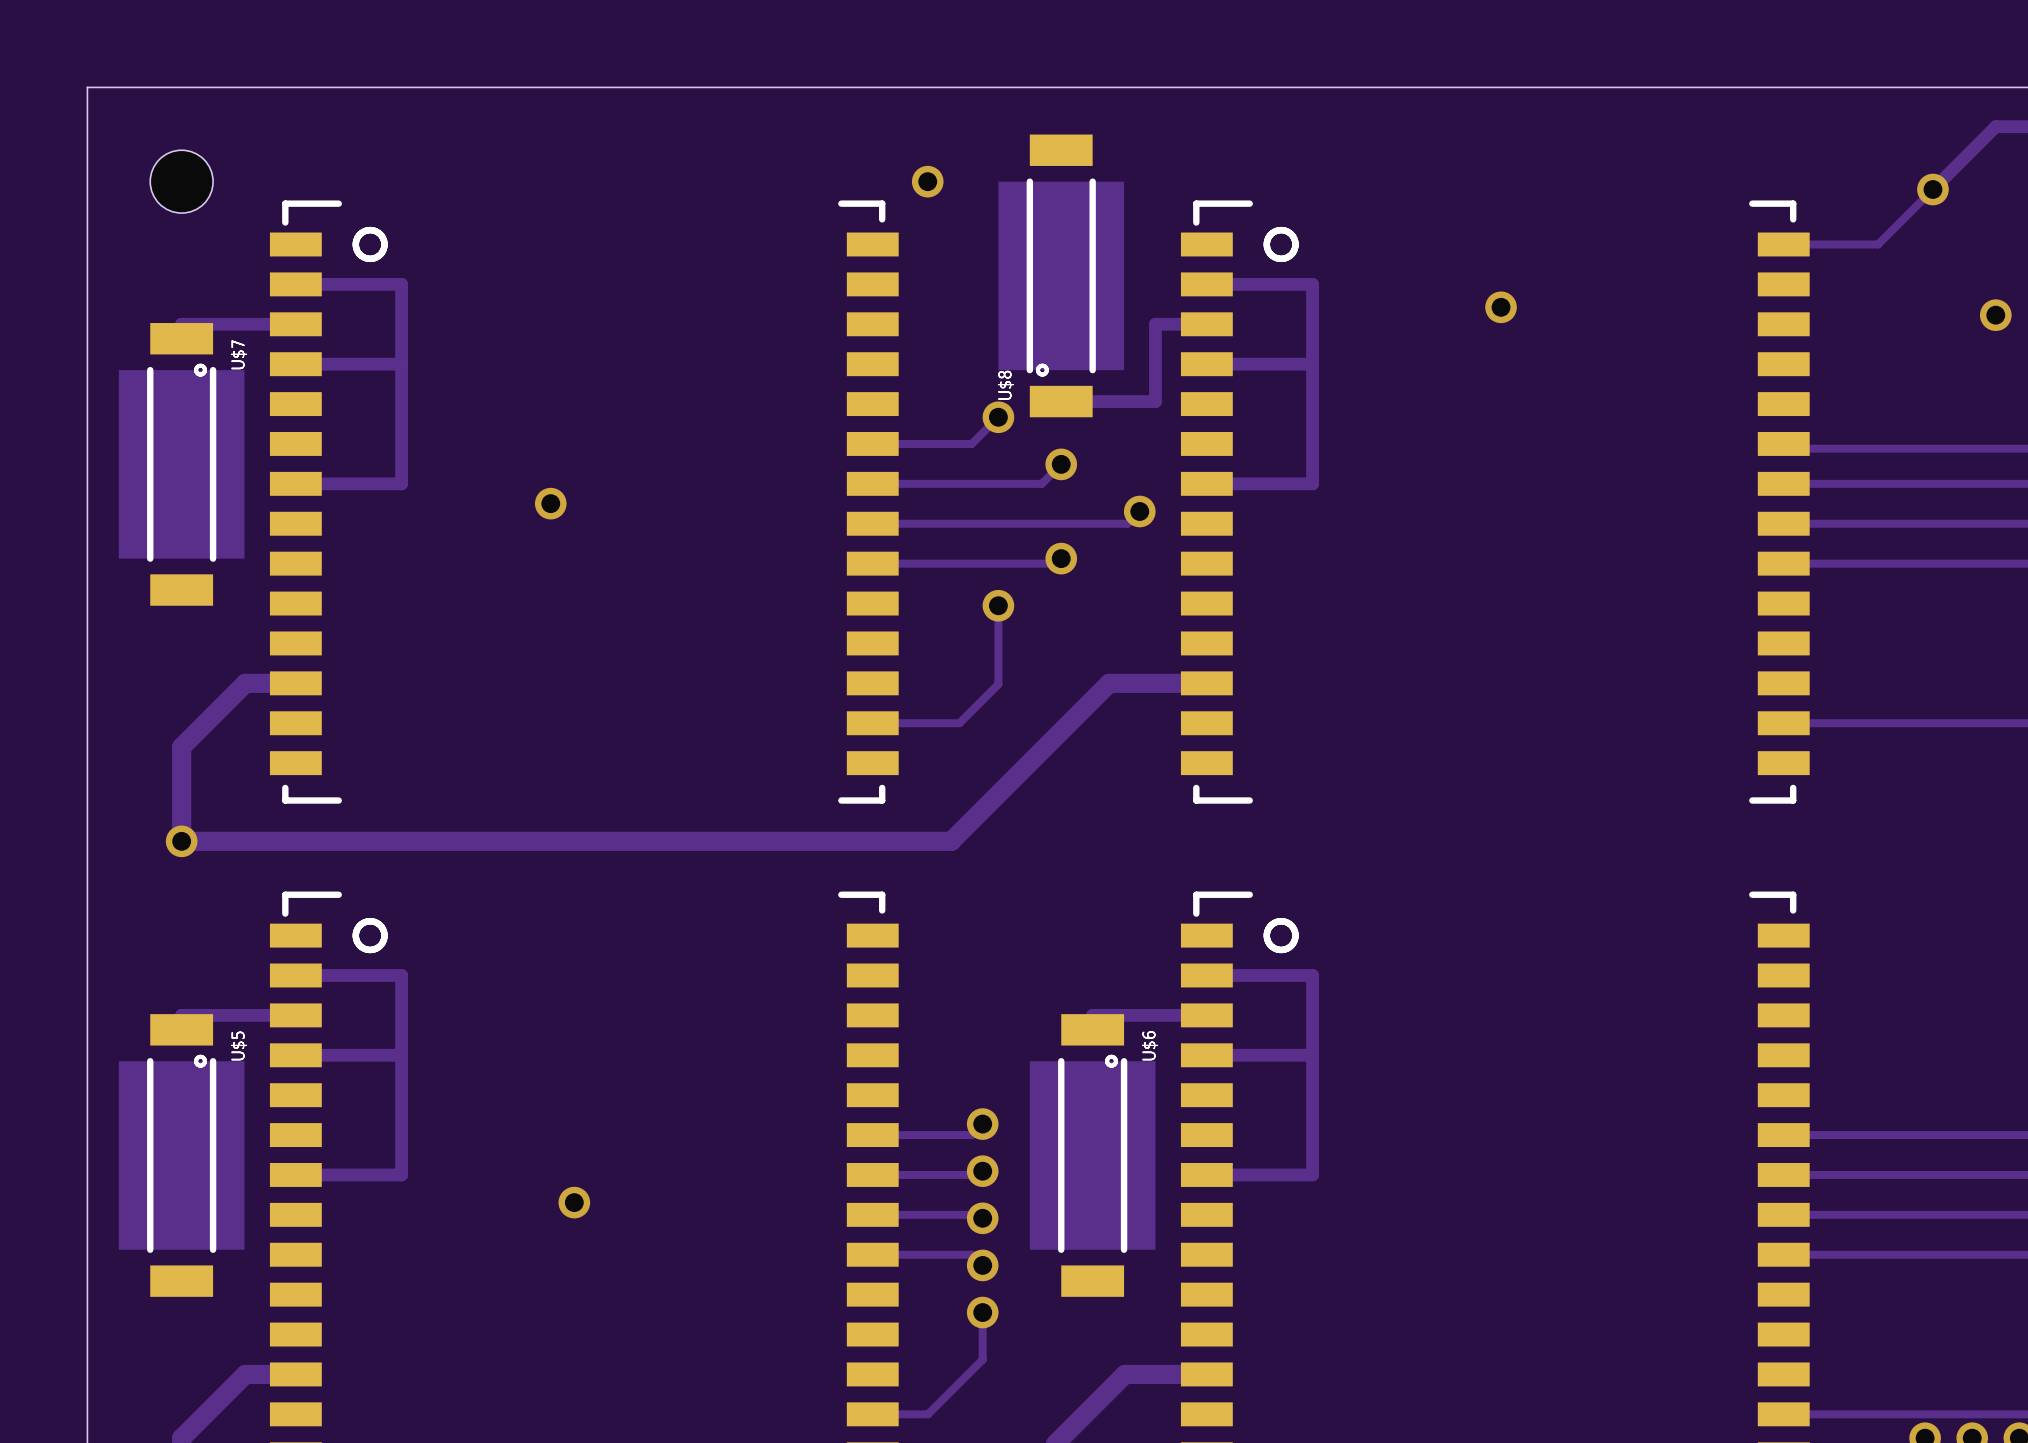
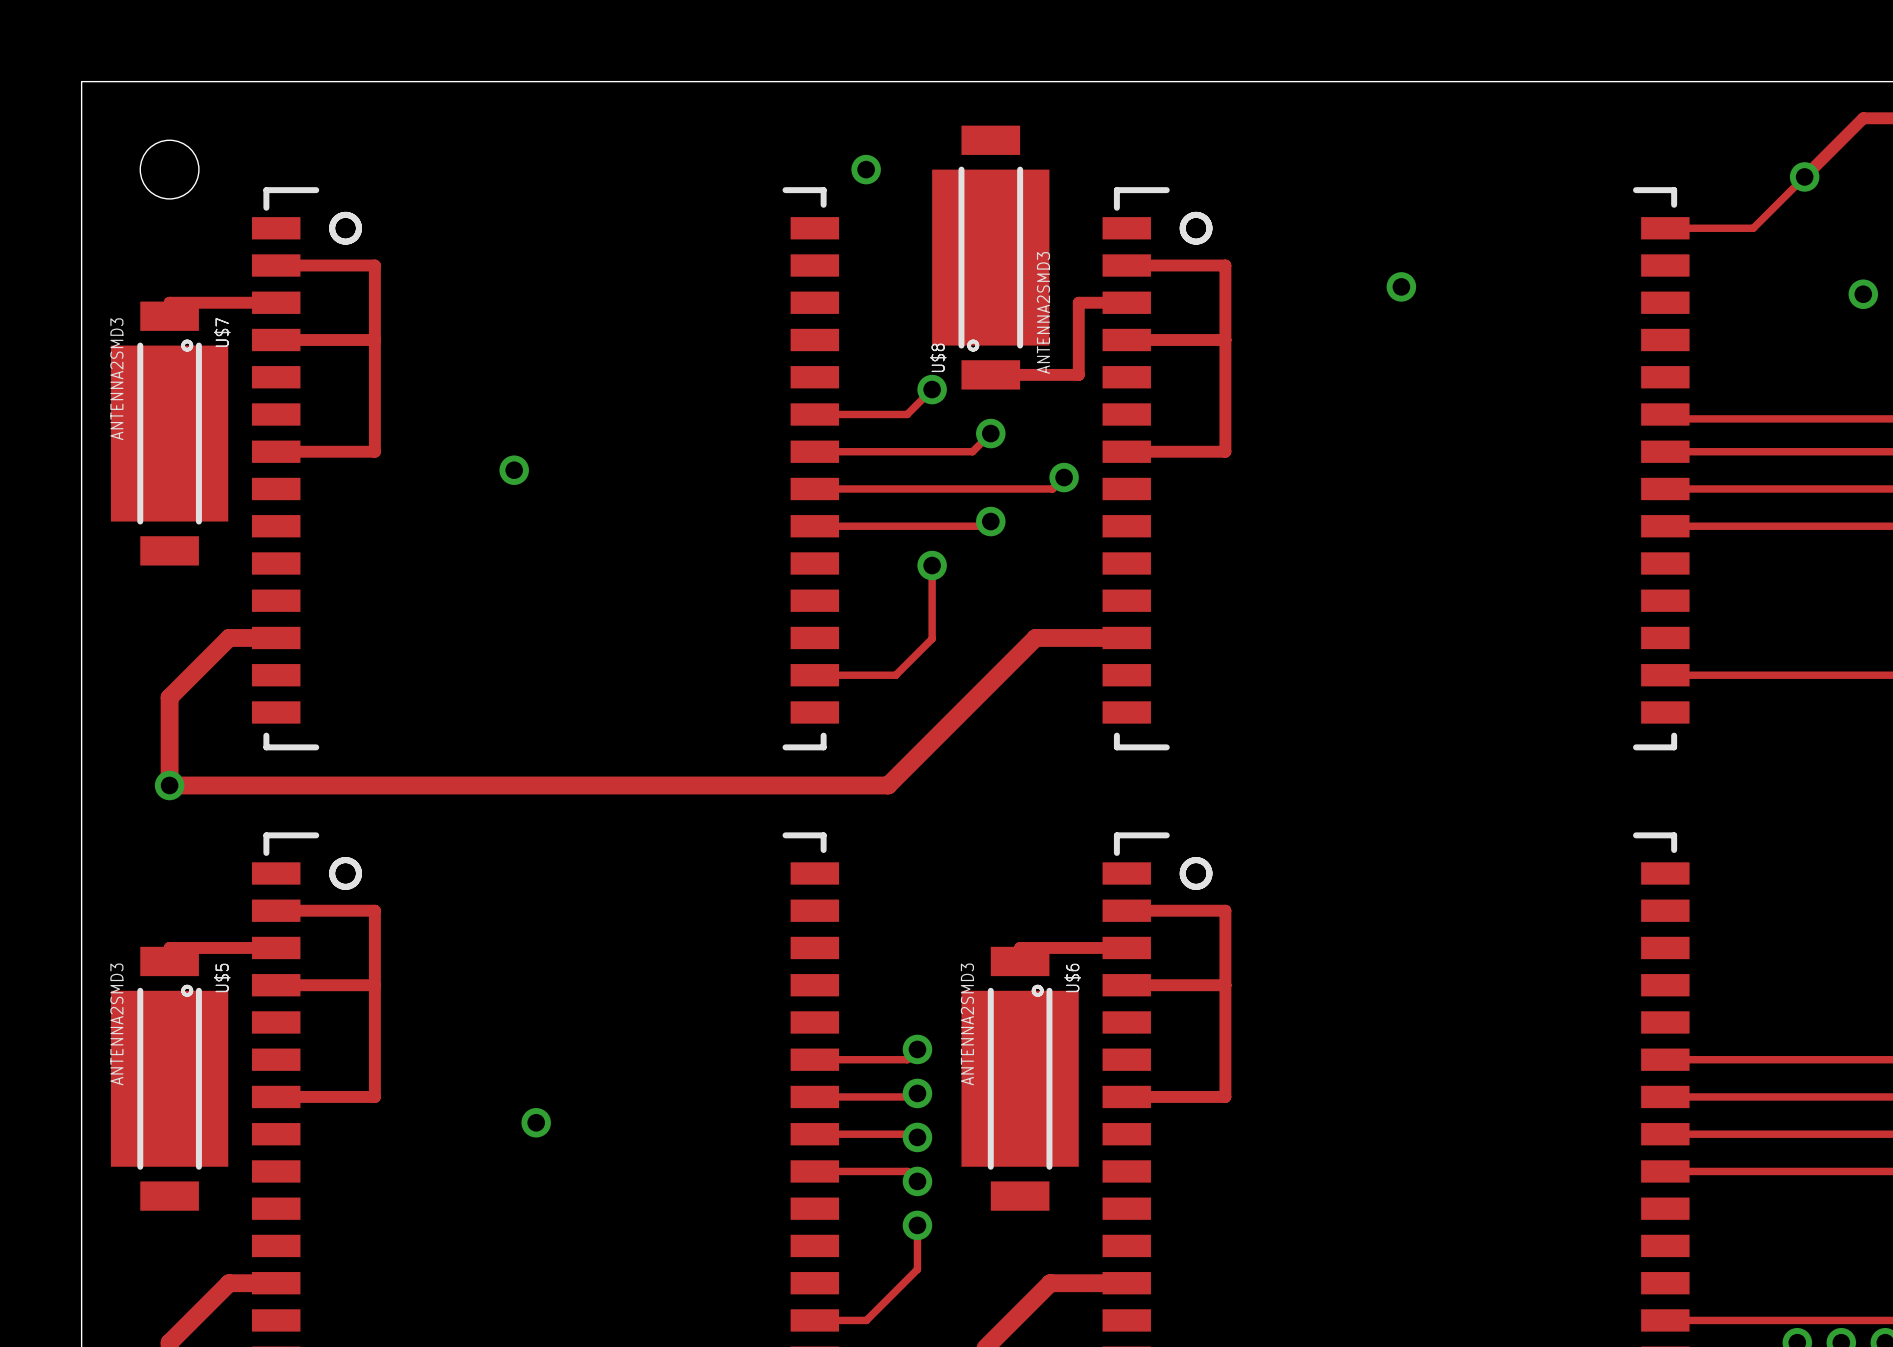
text: none -> ANTENNA2SMD3 (1043, 312)
text: none -> ANTENNA2SMD3 (116, 379)
text: none -> ANTENNA2SMD3 (116, 1024)
text: none -> ANTENNA2SMD3 (967, 1024)

